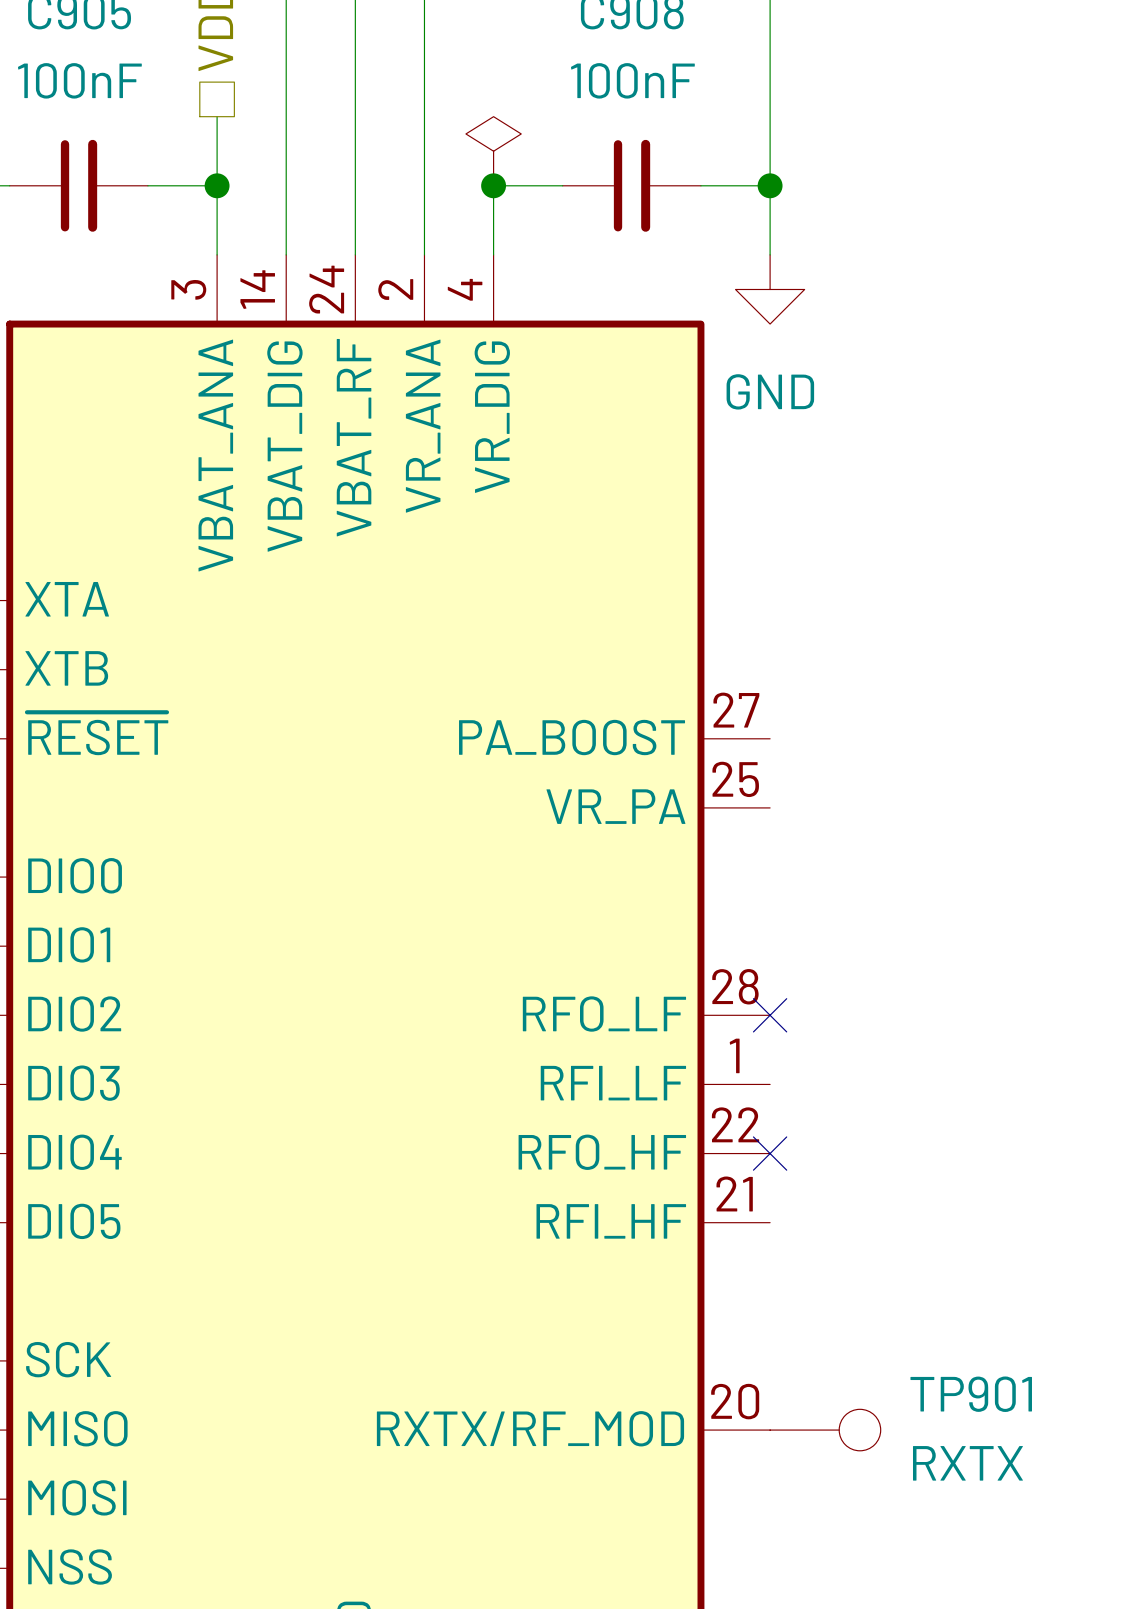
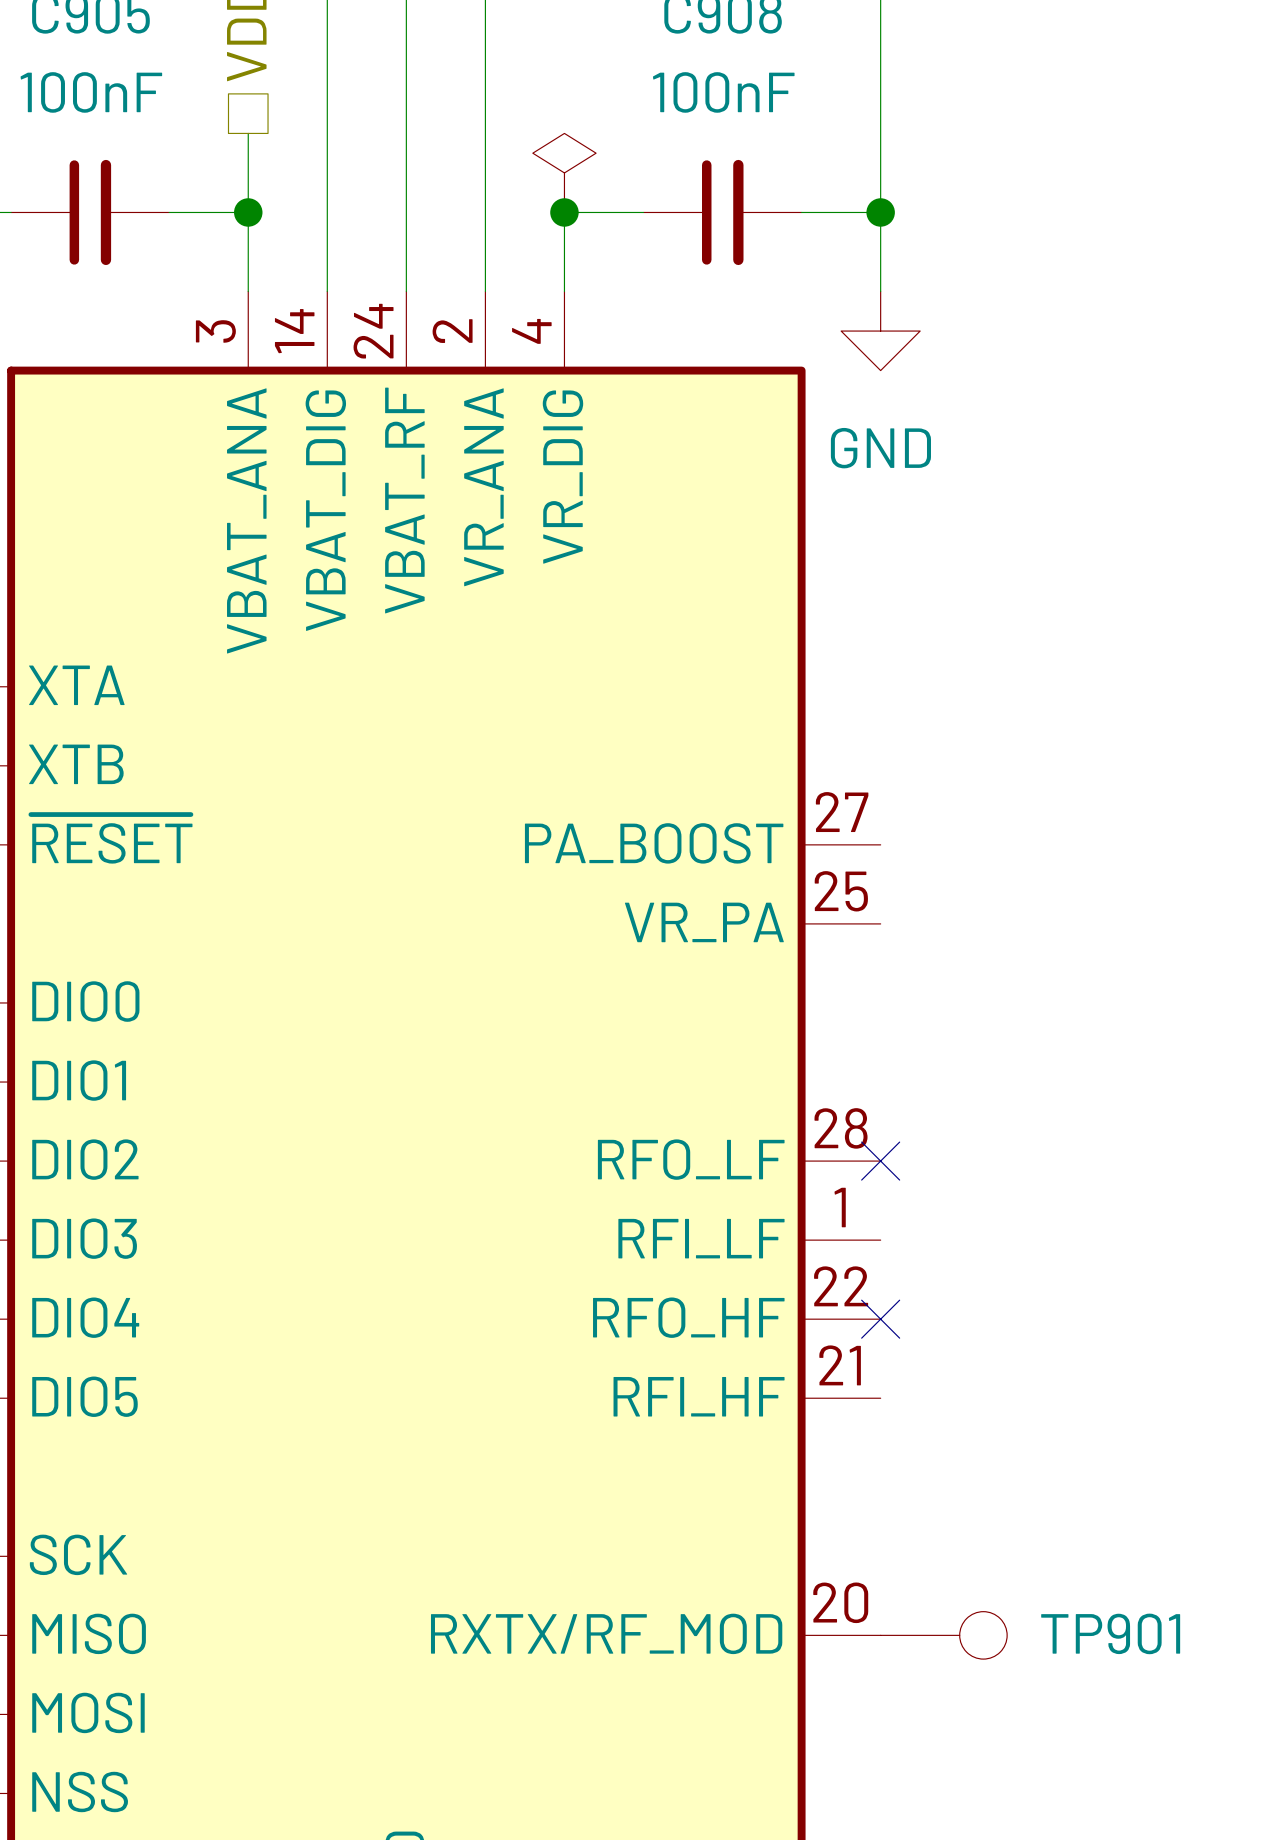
TP901 name position: TP901 (971, 1394) -> TP901 (1110, 1633)
TP901 value: RXTX (967, 1463) -> none

